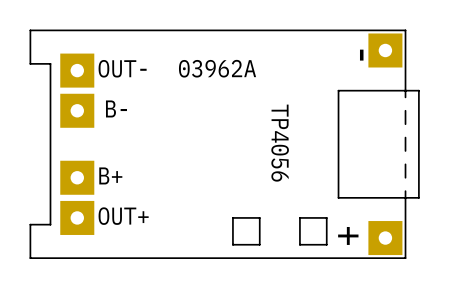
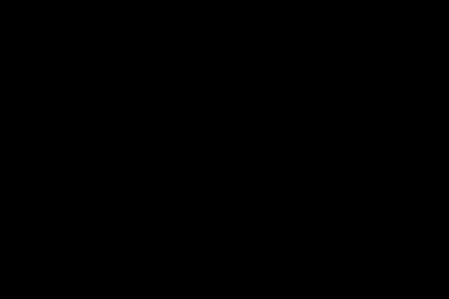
part: (224, 144) -> none

